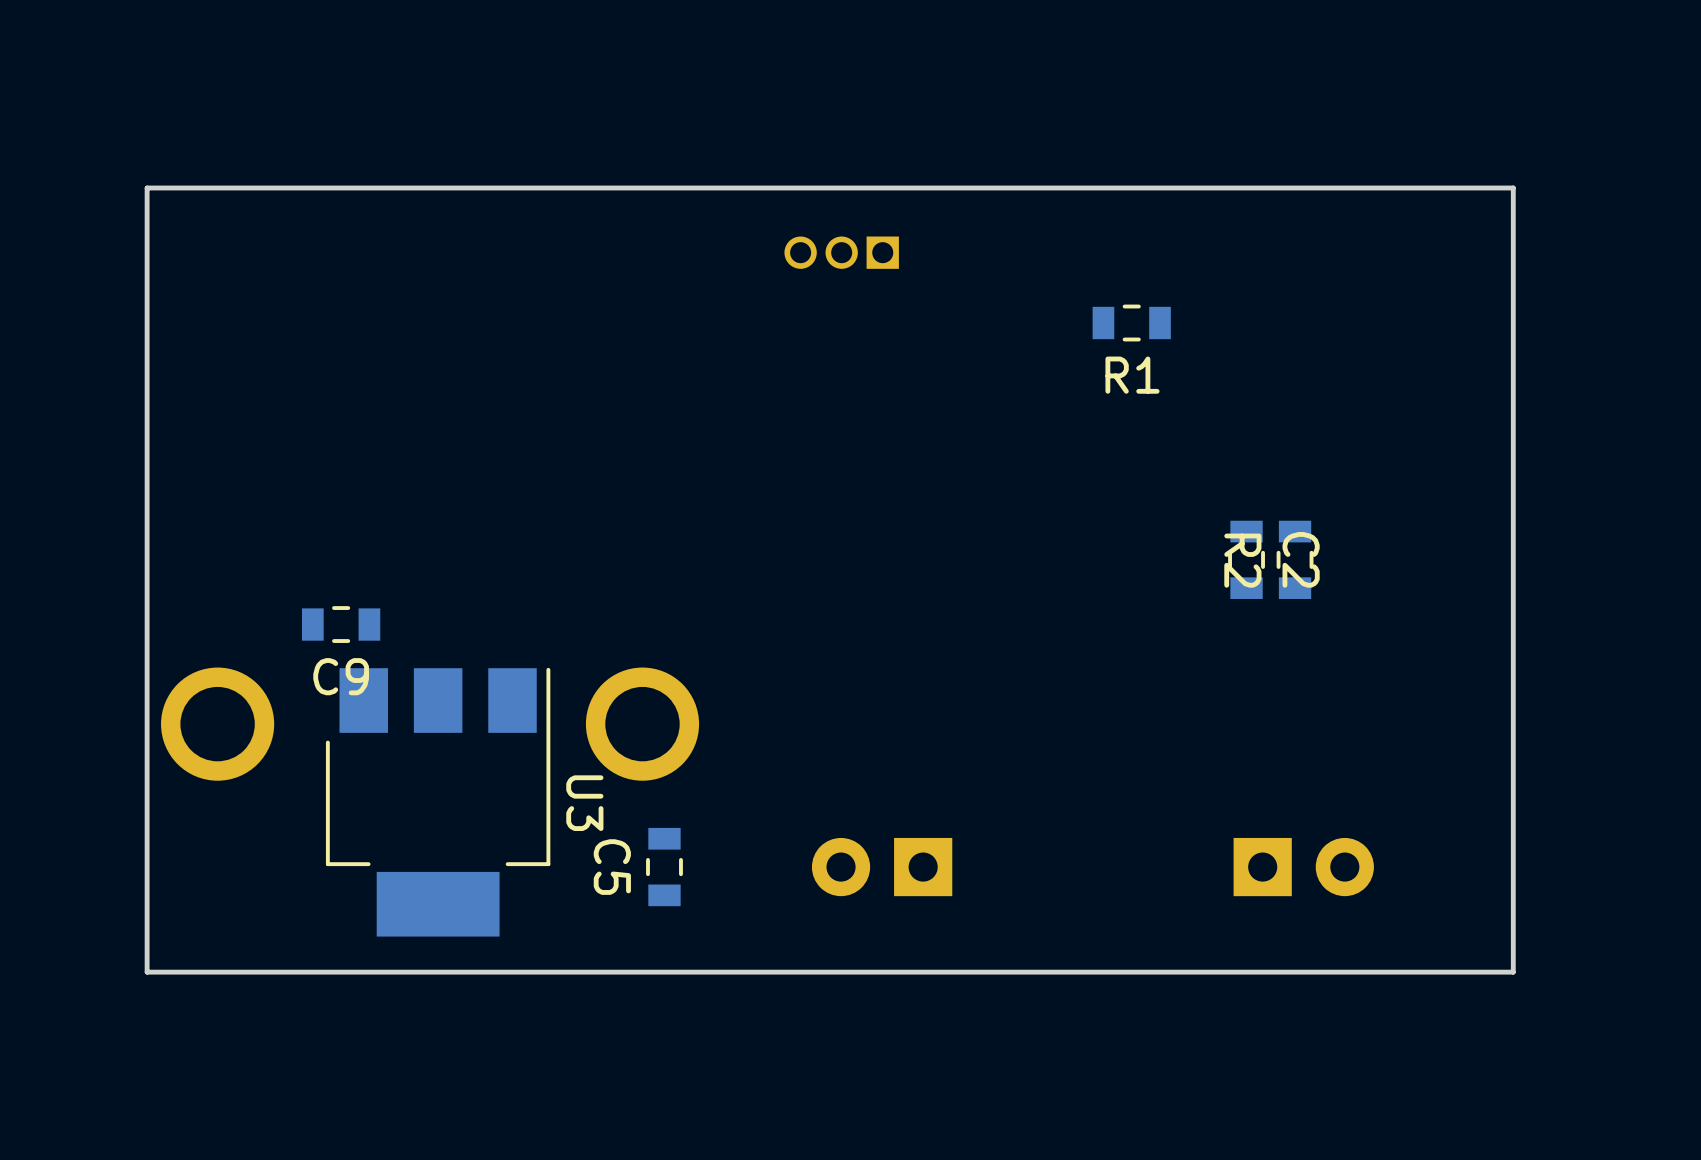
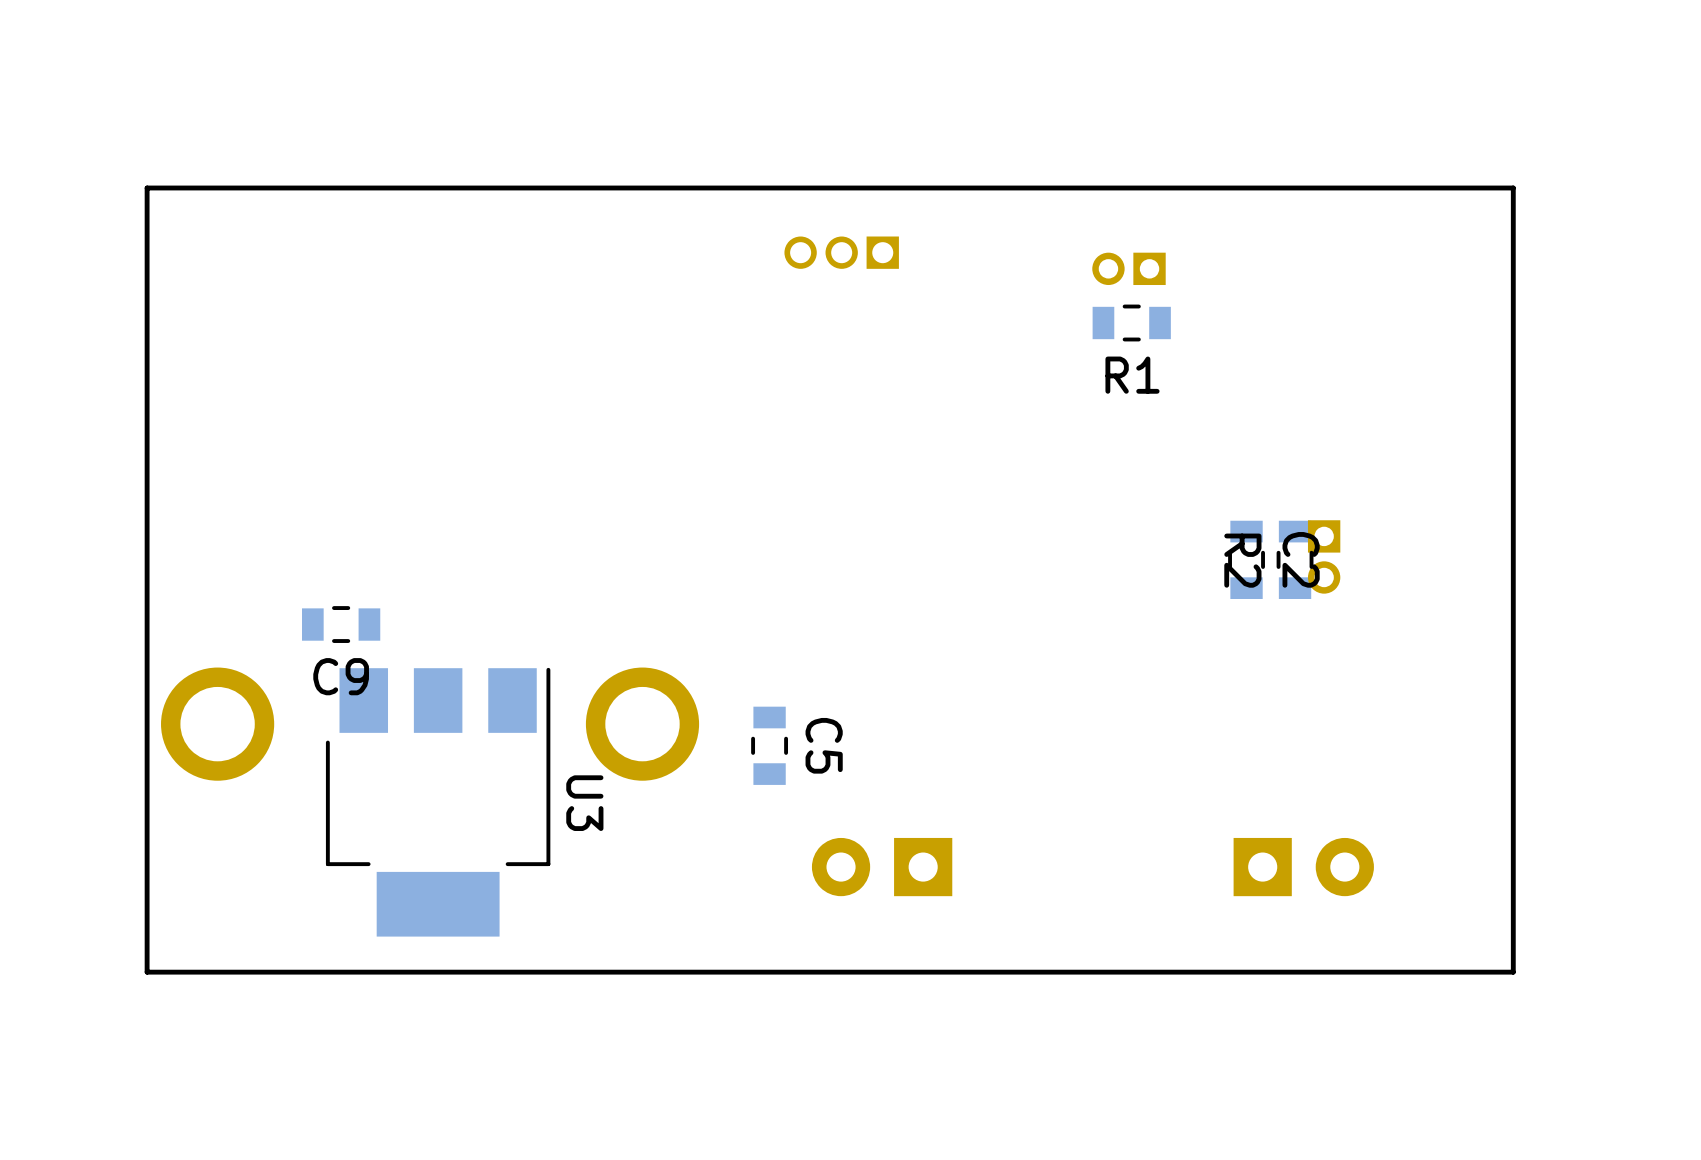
part: none -> (1128, 268)
part: none -> (1324, 556)
C5 name position: C5 (612, 867) -> C5 (824, 745)
C5 position: (664, 867) -> (769, 745)

